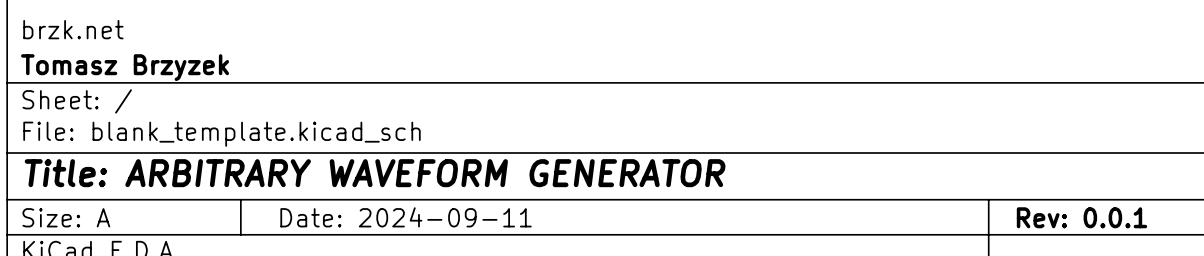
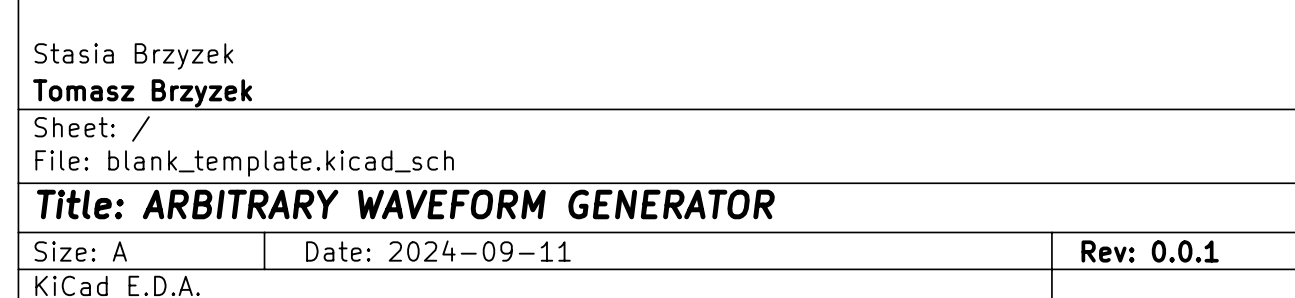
title block: brzk.net (73, 29) -> Stasia Brzyzek (133, 56)

